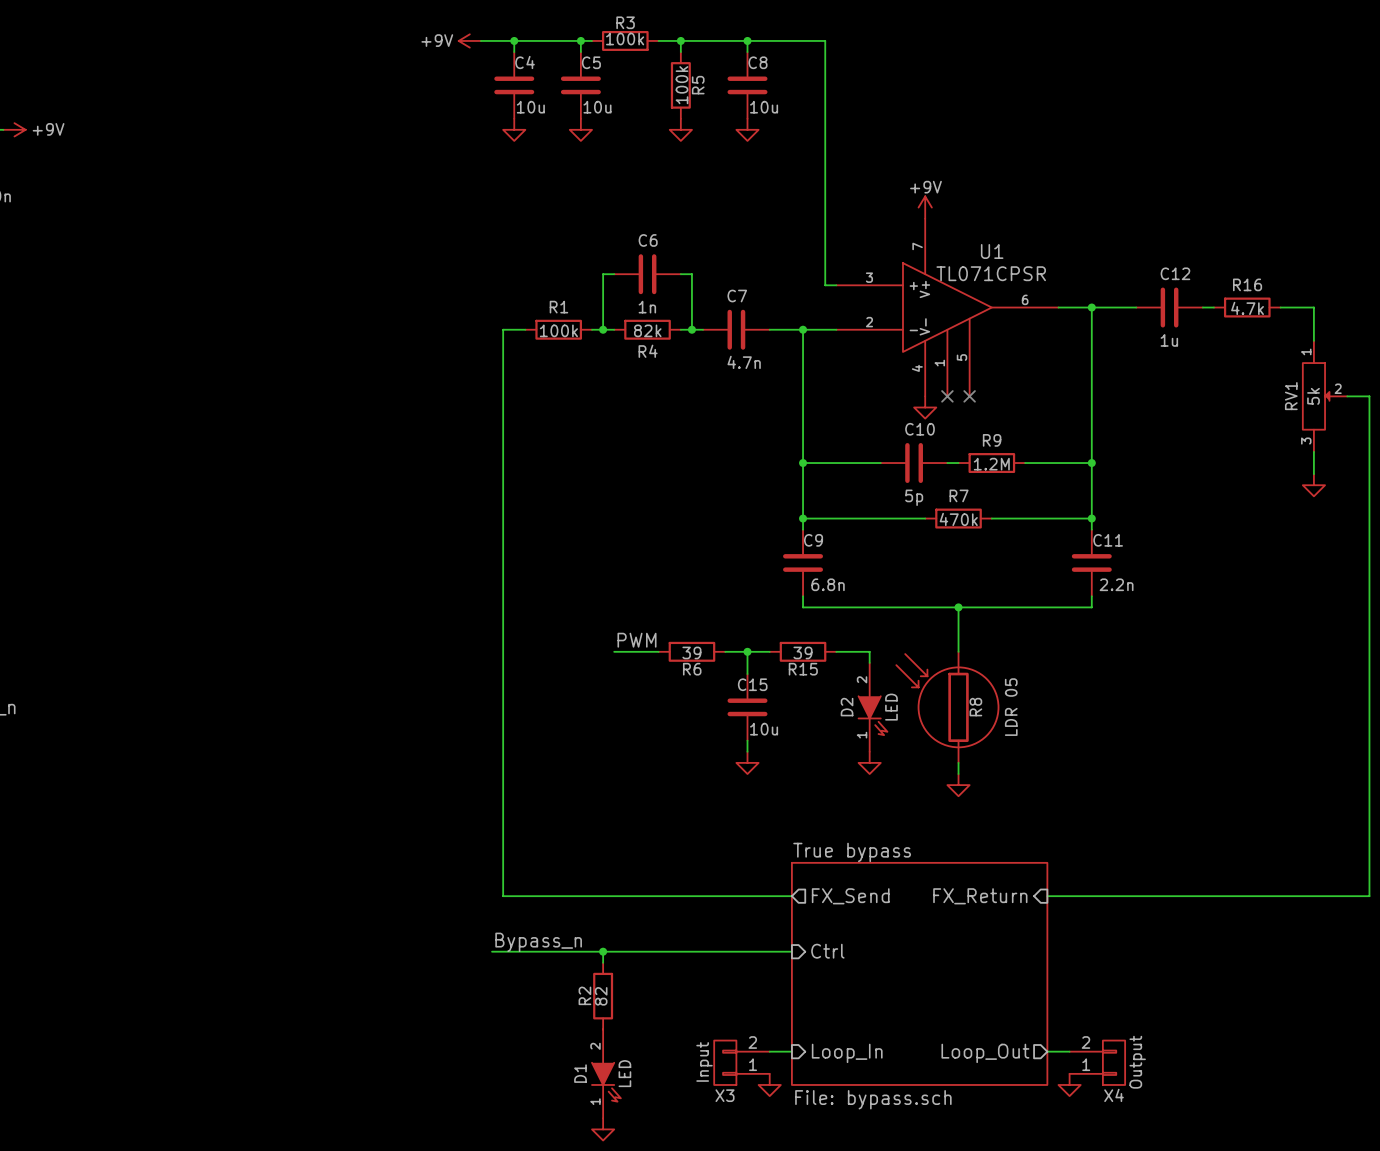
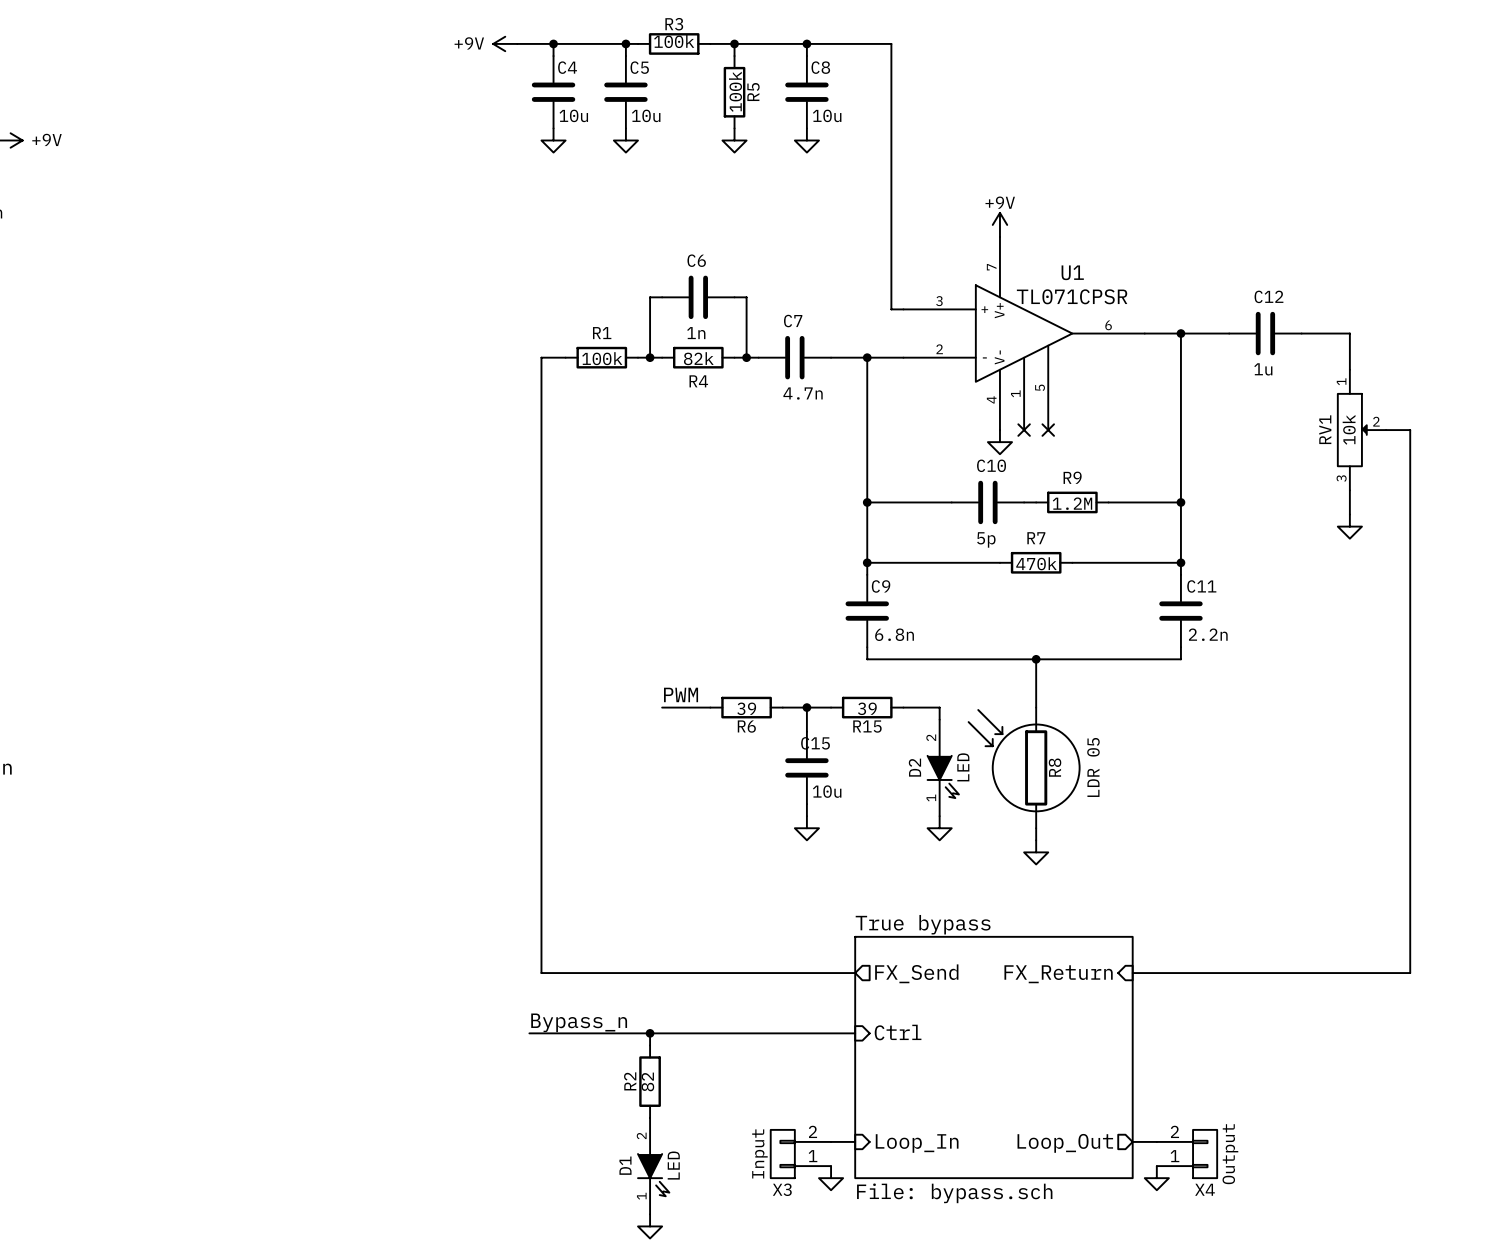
R16: 4.7k (1247, 307) -> none
wire: (1280, 307) (1313, 307) (1313, 340) -> (1313, 333) (1349, 333) (1349, 369)
RV1 value: 5k (1313, 396) -> 10k (1349, 429)
RV1 position: (1325, 396) -> (1361, 430)
wire: (1347, 396) (1369, 396) (1369, 896) (1302, 896) -> (1386, 430) (1410, 430) (1410, 973)
wire: (1313, 451) (1313, 474) -> (1349, 490) (1349, 514)
power symbol position: (1313, 485) -> (1349, 526)

